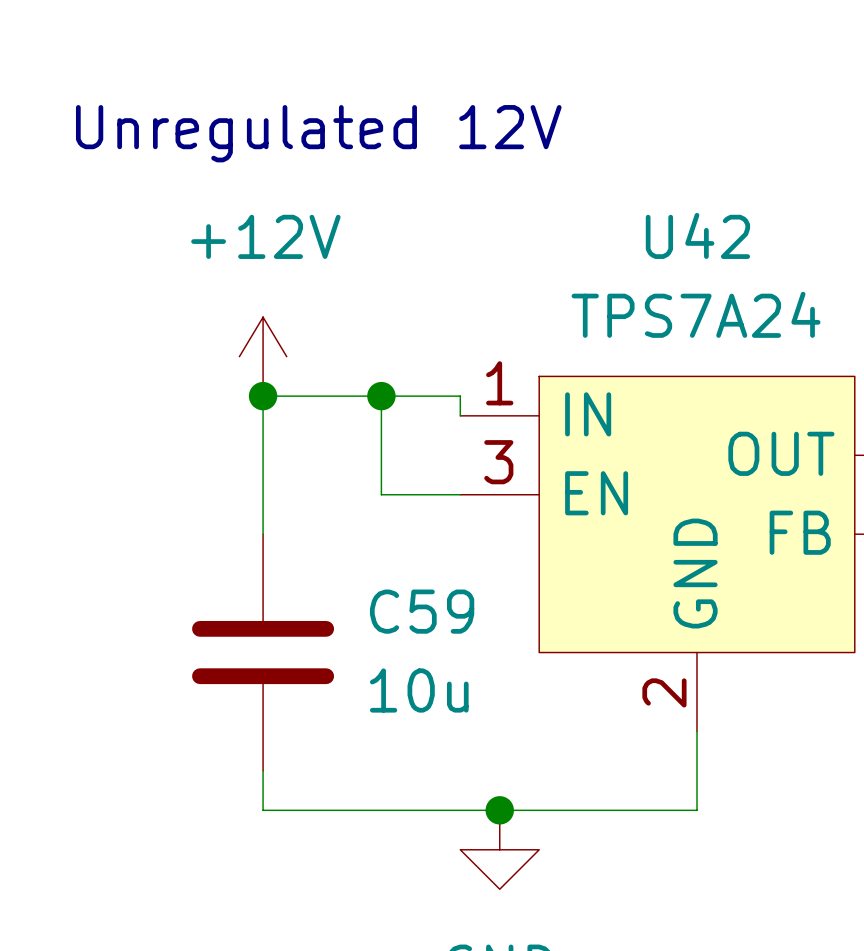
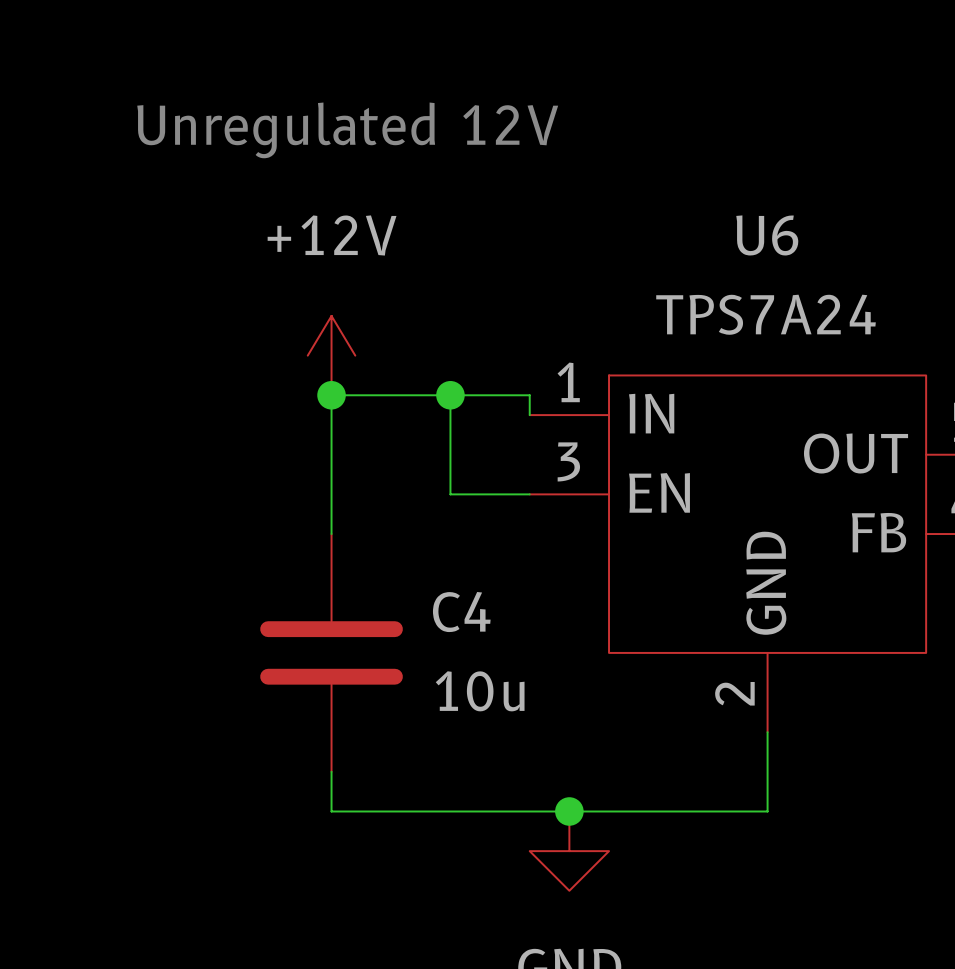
U42 name: U42 (697, 235) -> U6 (767, 235)
C59 name: C59 (422, 611) -> C4 (461, 612)

